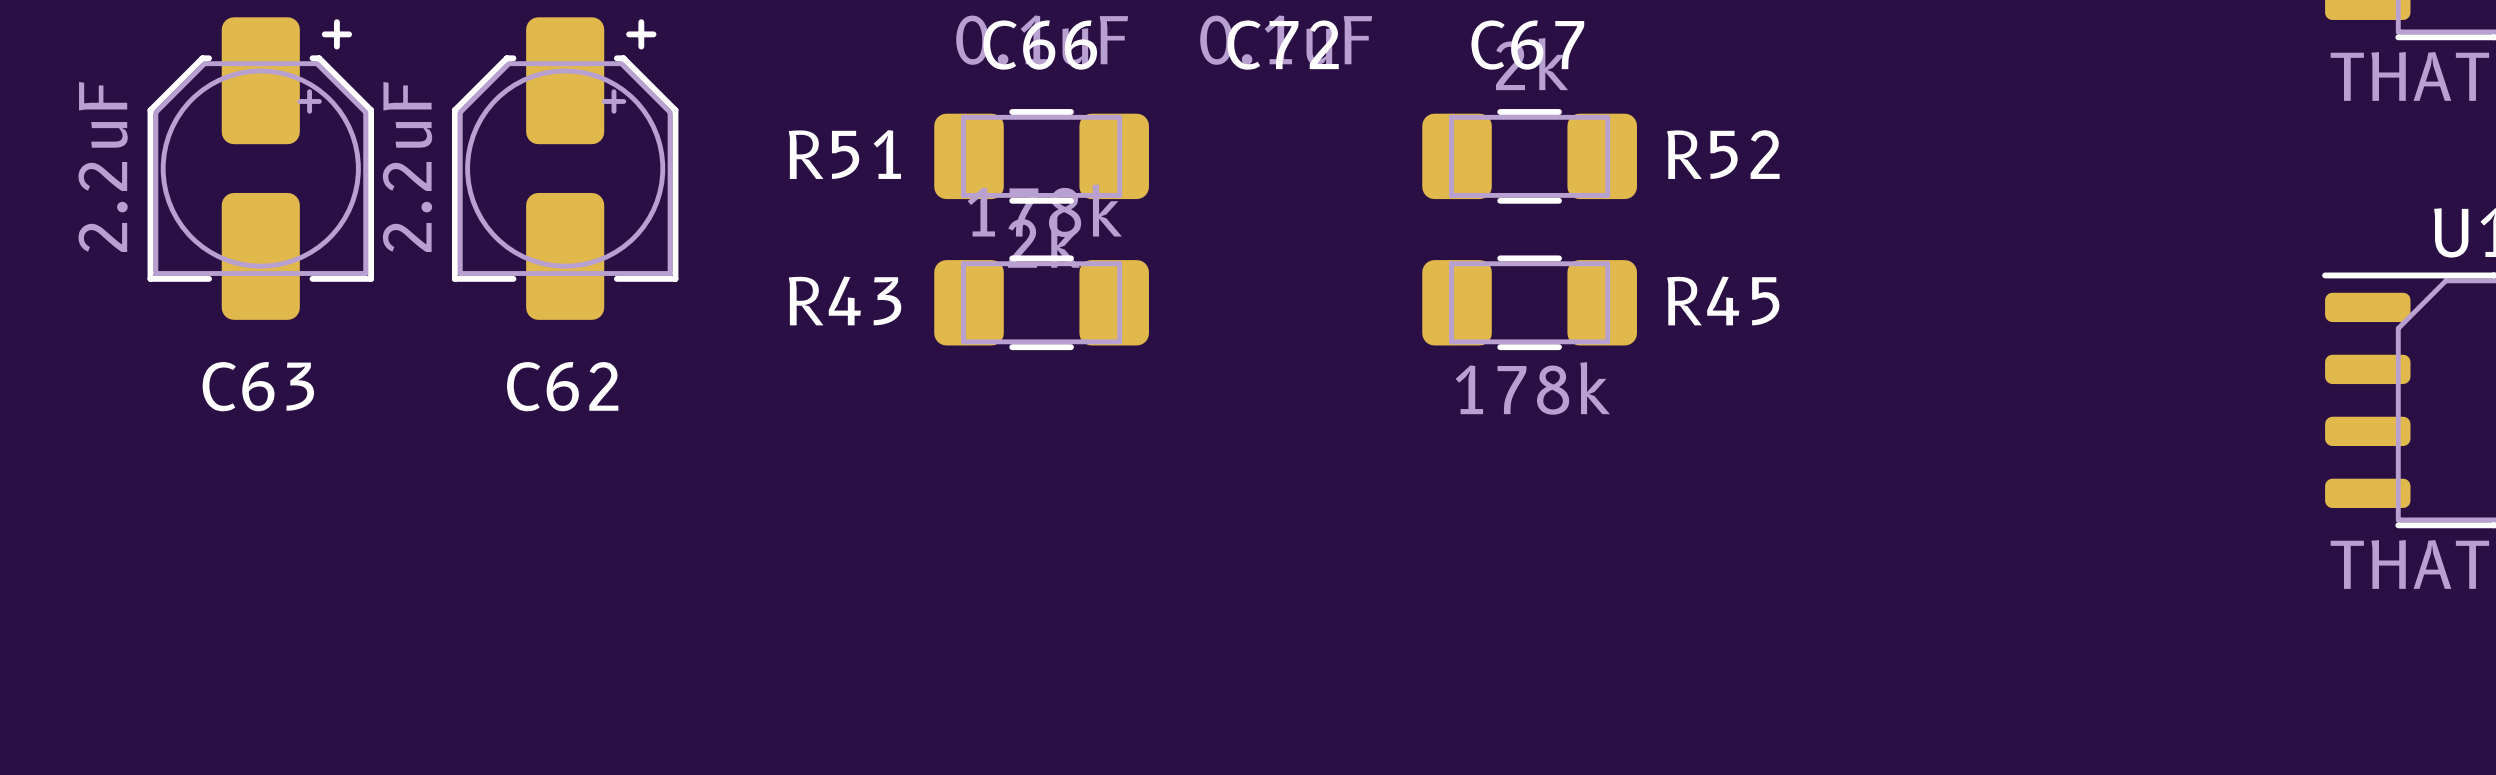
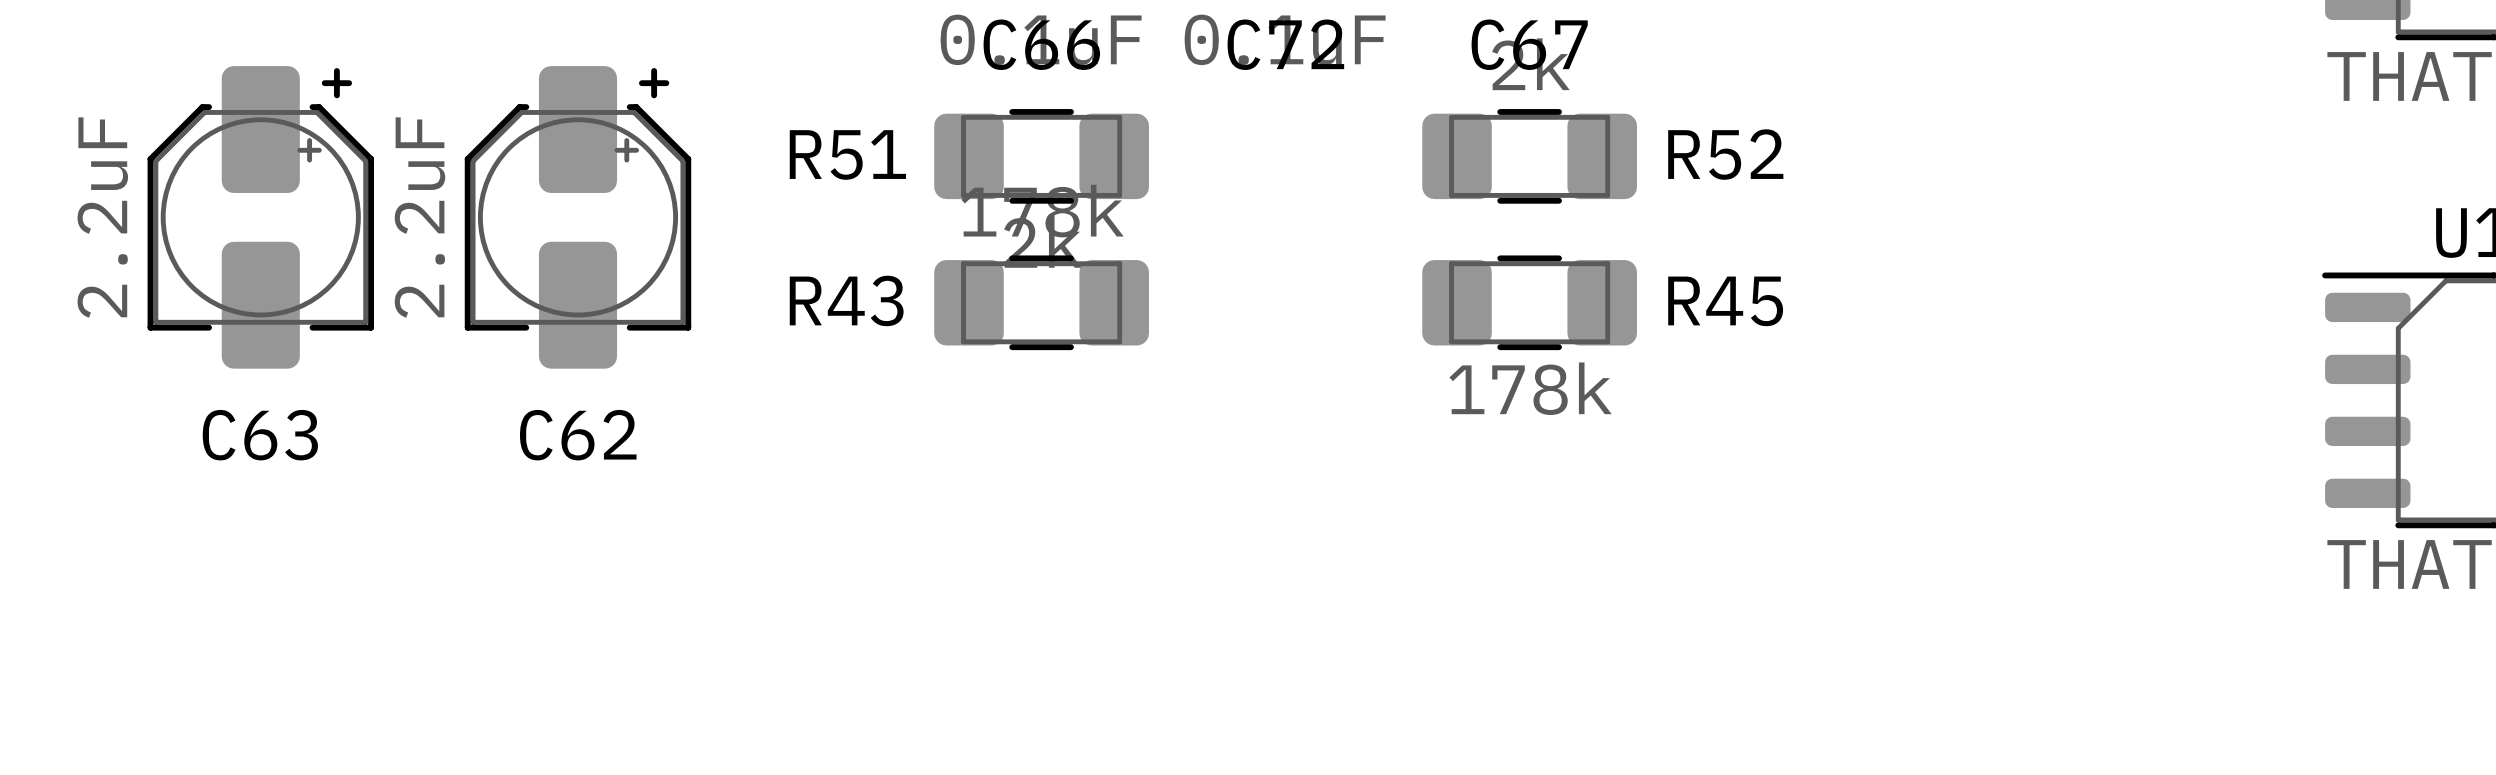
C63 position: (260, 168) -> (260, 217)
C62 position: (565, 168) -> (577, 217)

